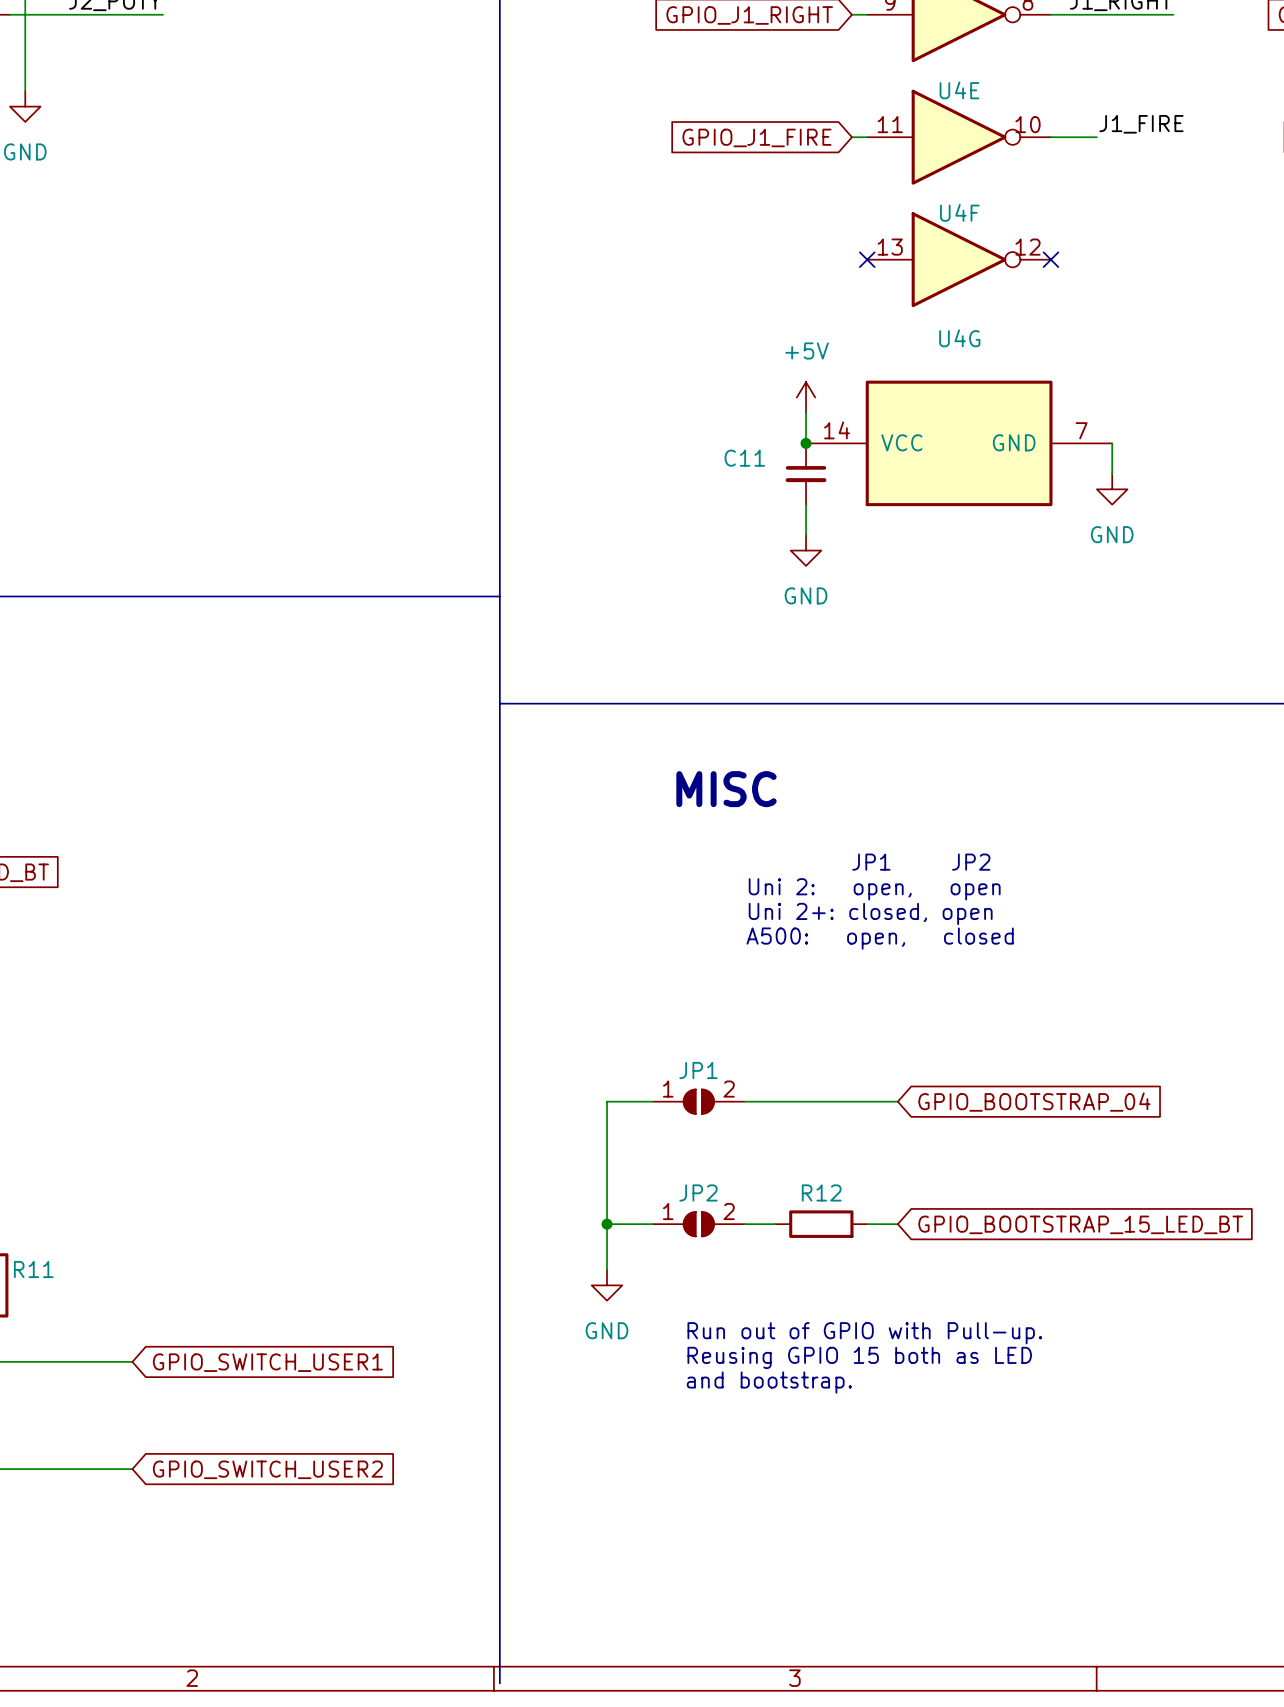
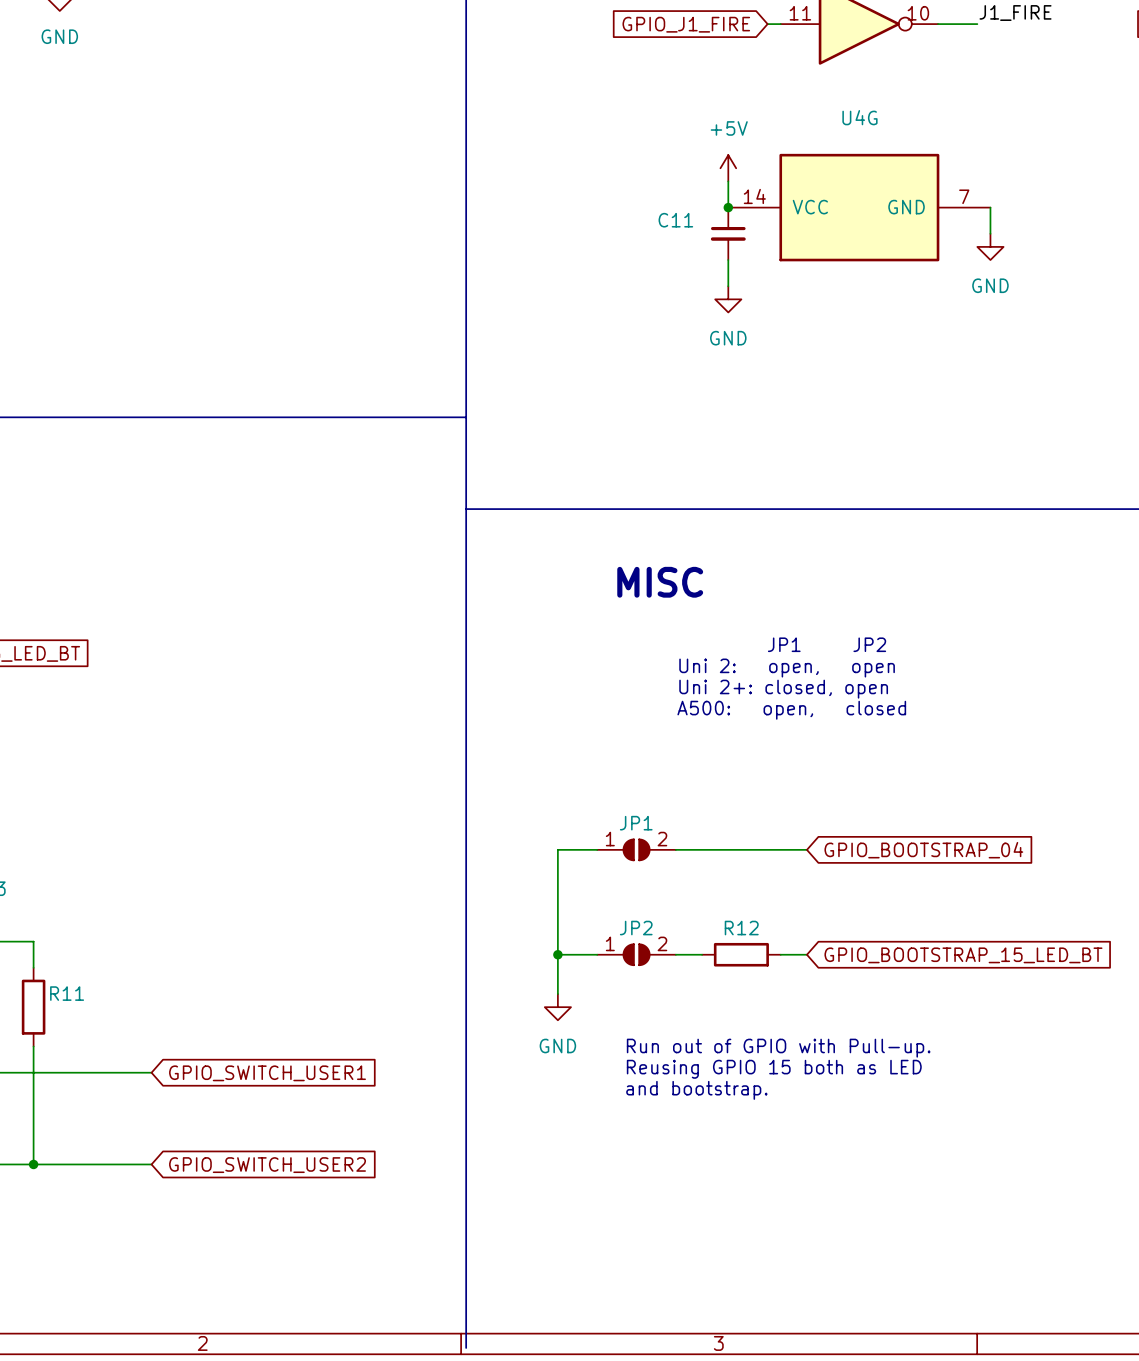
no-connect mark: (867, 259) -> none
U4F: (959, 259) -> none
no-connect mark: (1050, 259) -> none
junction: none -> (728, 207)
power symbol position: +5V (806, 397) -> +5V (728, 168)
junction: (806, 443) -> none
U4G position: (959, 443) -> (859, 207)
wire: (1112, 443) (1112, 474) -> (990, 207) (990, 233)
C11 position: (806, 474) -> (728, 233)
power symbol position: GND (1112, 489) -> GND (990, 246)
wire: (806, 504) (806, 535) -> (728, 181) (728, 207)
power symbol position: GND (806, 550) -> GND (728, 299)

